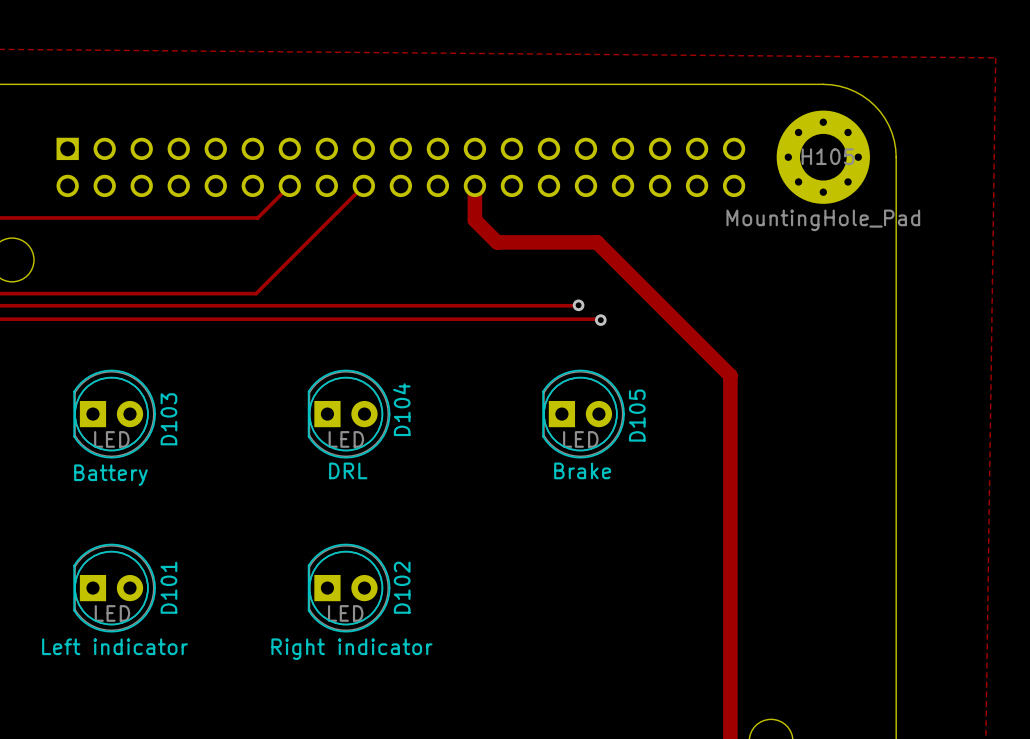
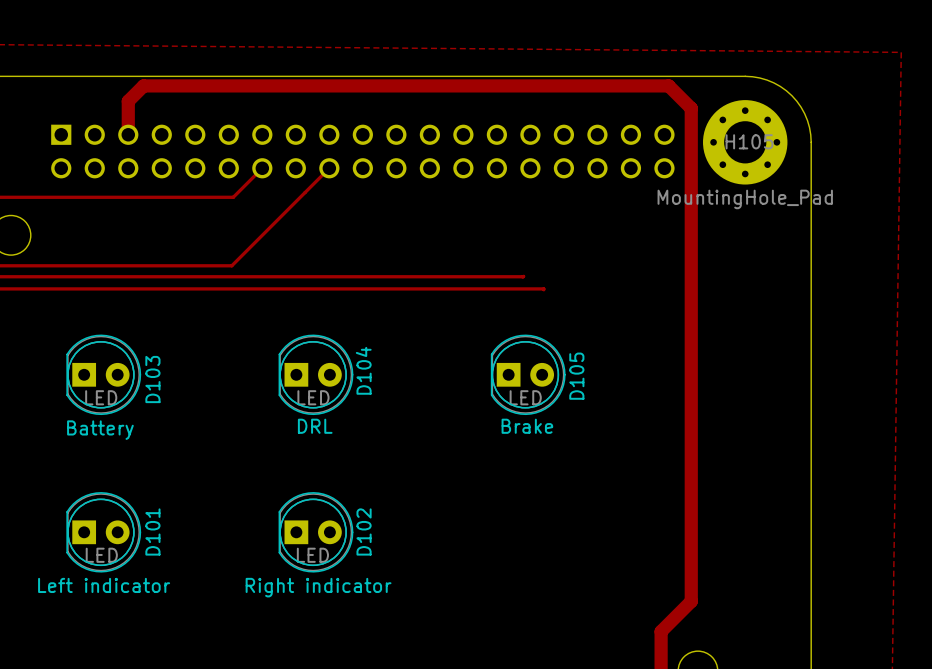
track: (474, 185) (474, 220) (497, 242) (597, 242) (730, 375) (730, 697) -> (128, 134) (128, 101) (143, 85) (668, 85) (691, 108) (691, 601) (661, 631)
via: (578, 305) -> none
via: (600, 320) -> none

